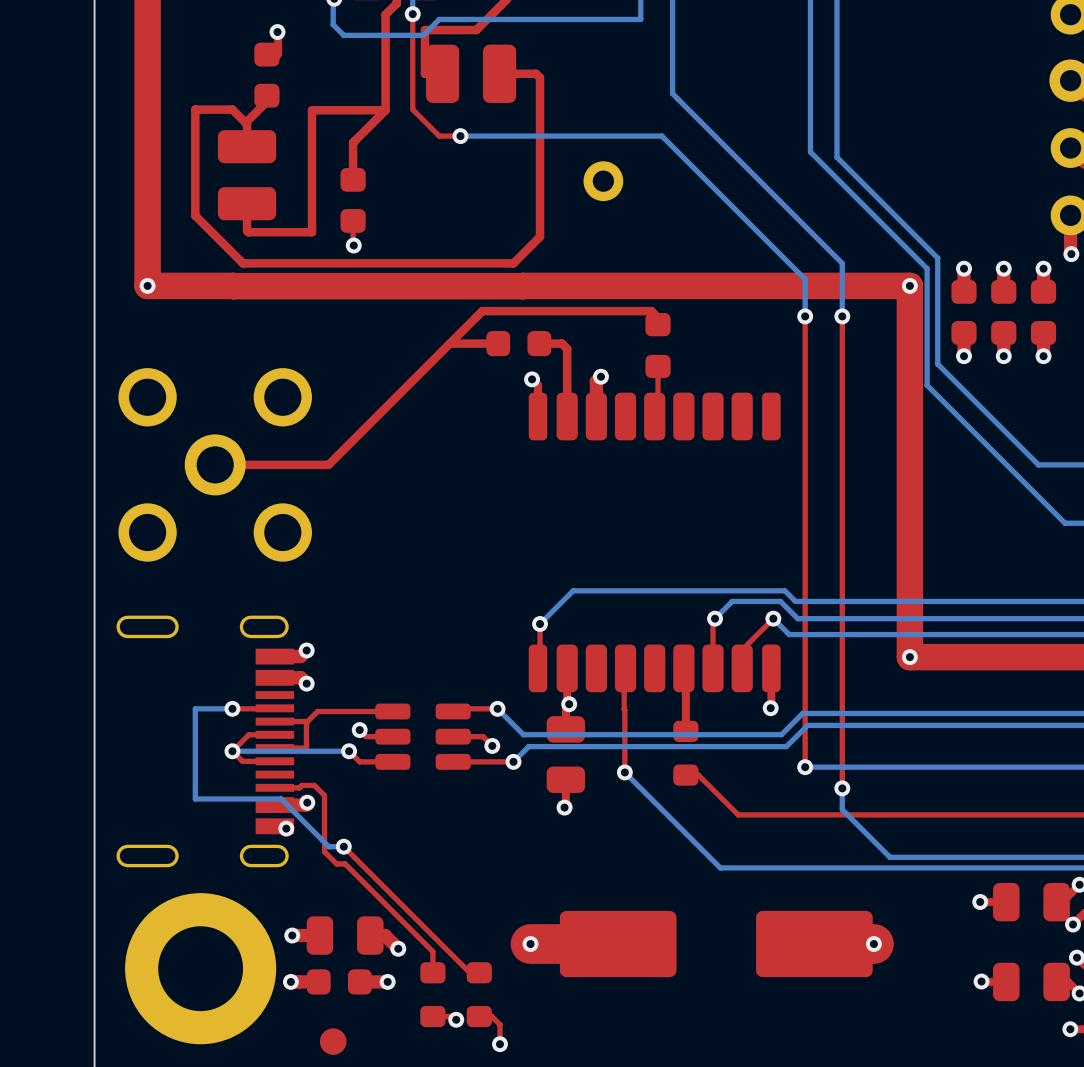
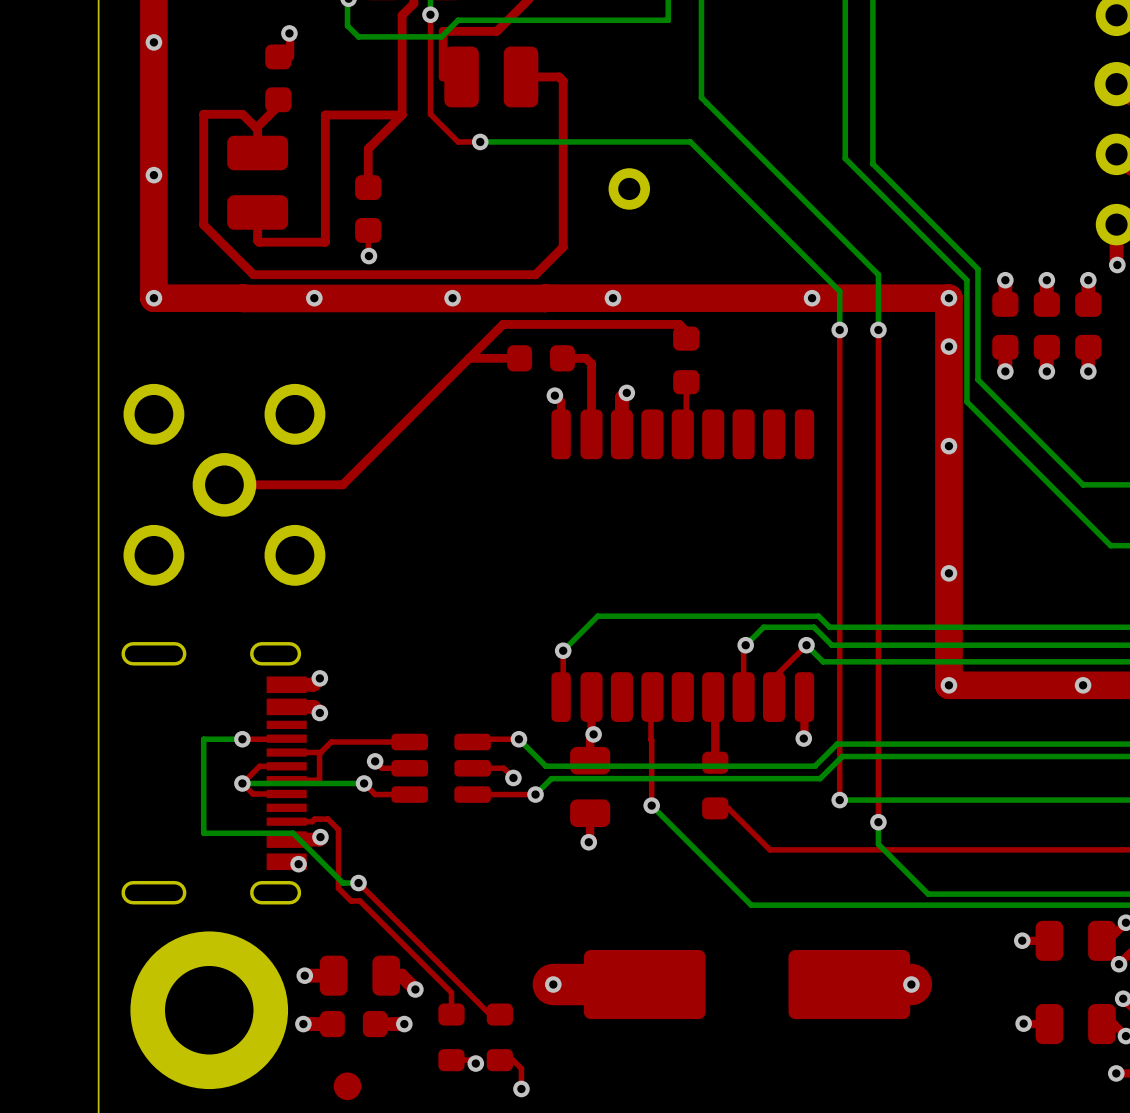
via: none -> (153, 42)
via: none -> (153, 175)
via: none -> (314, 298)
via: none -> (452, 298)
via: none -> (612, 298)
via: none -> (812, 298)
via: none -> (948, 346)
via: none -> (948, 446)
via: none -> (948, 573)
via: none -> (1083, 685)

